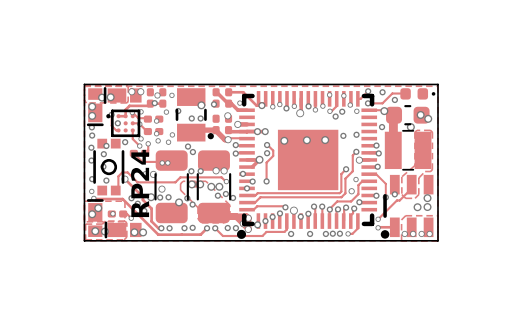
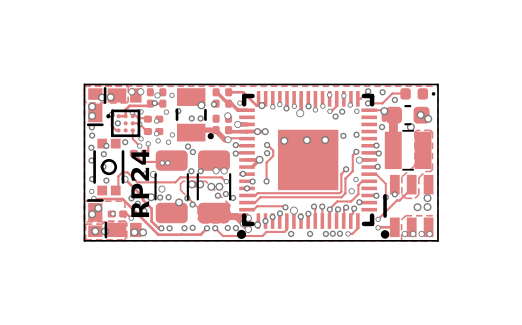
track: none -> (384, 111) (384, 119) (384, 111)

